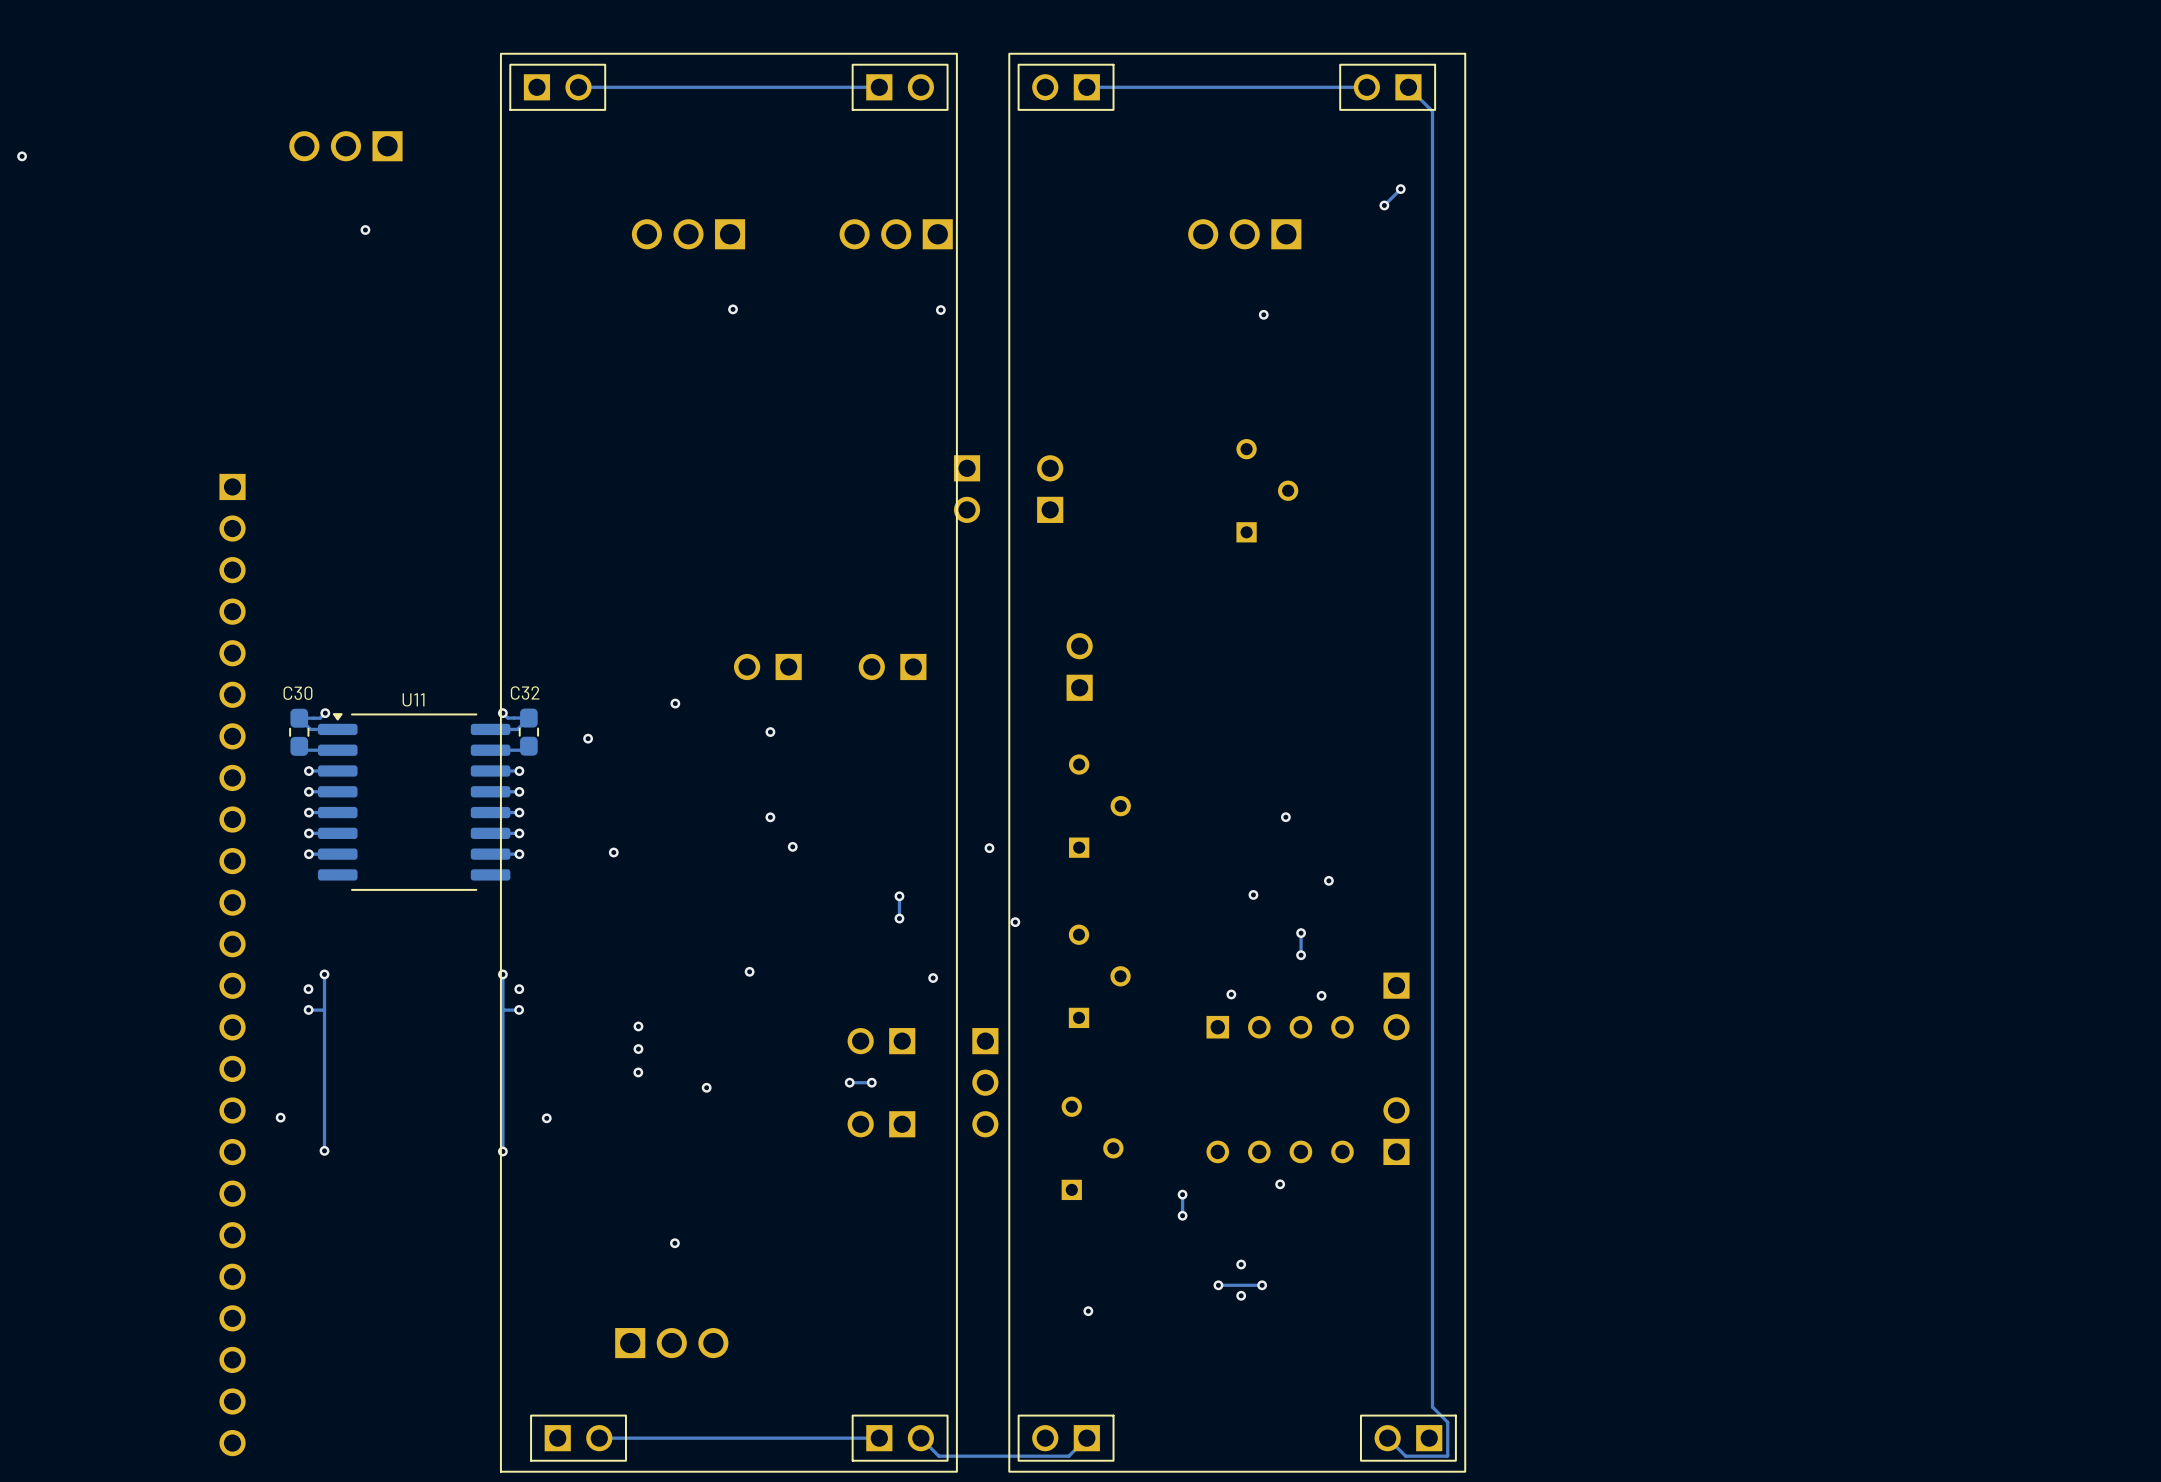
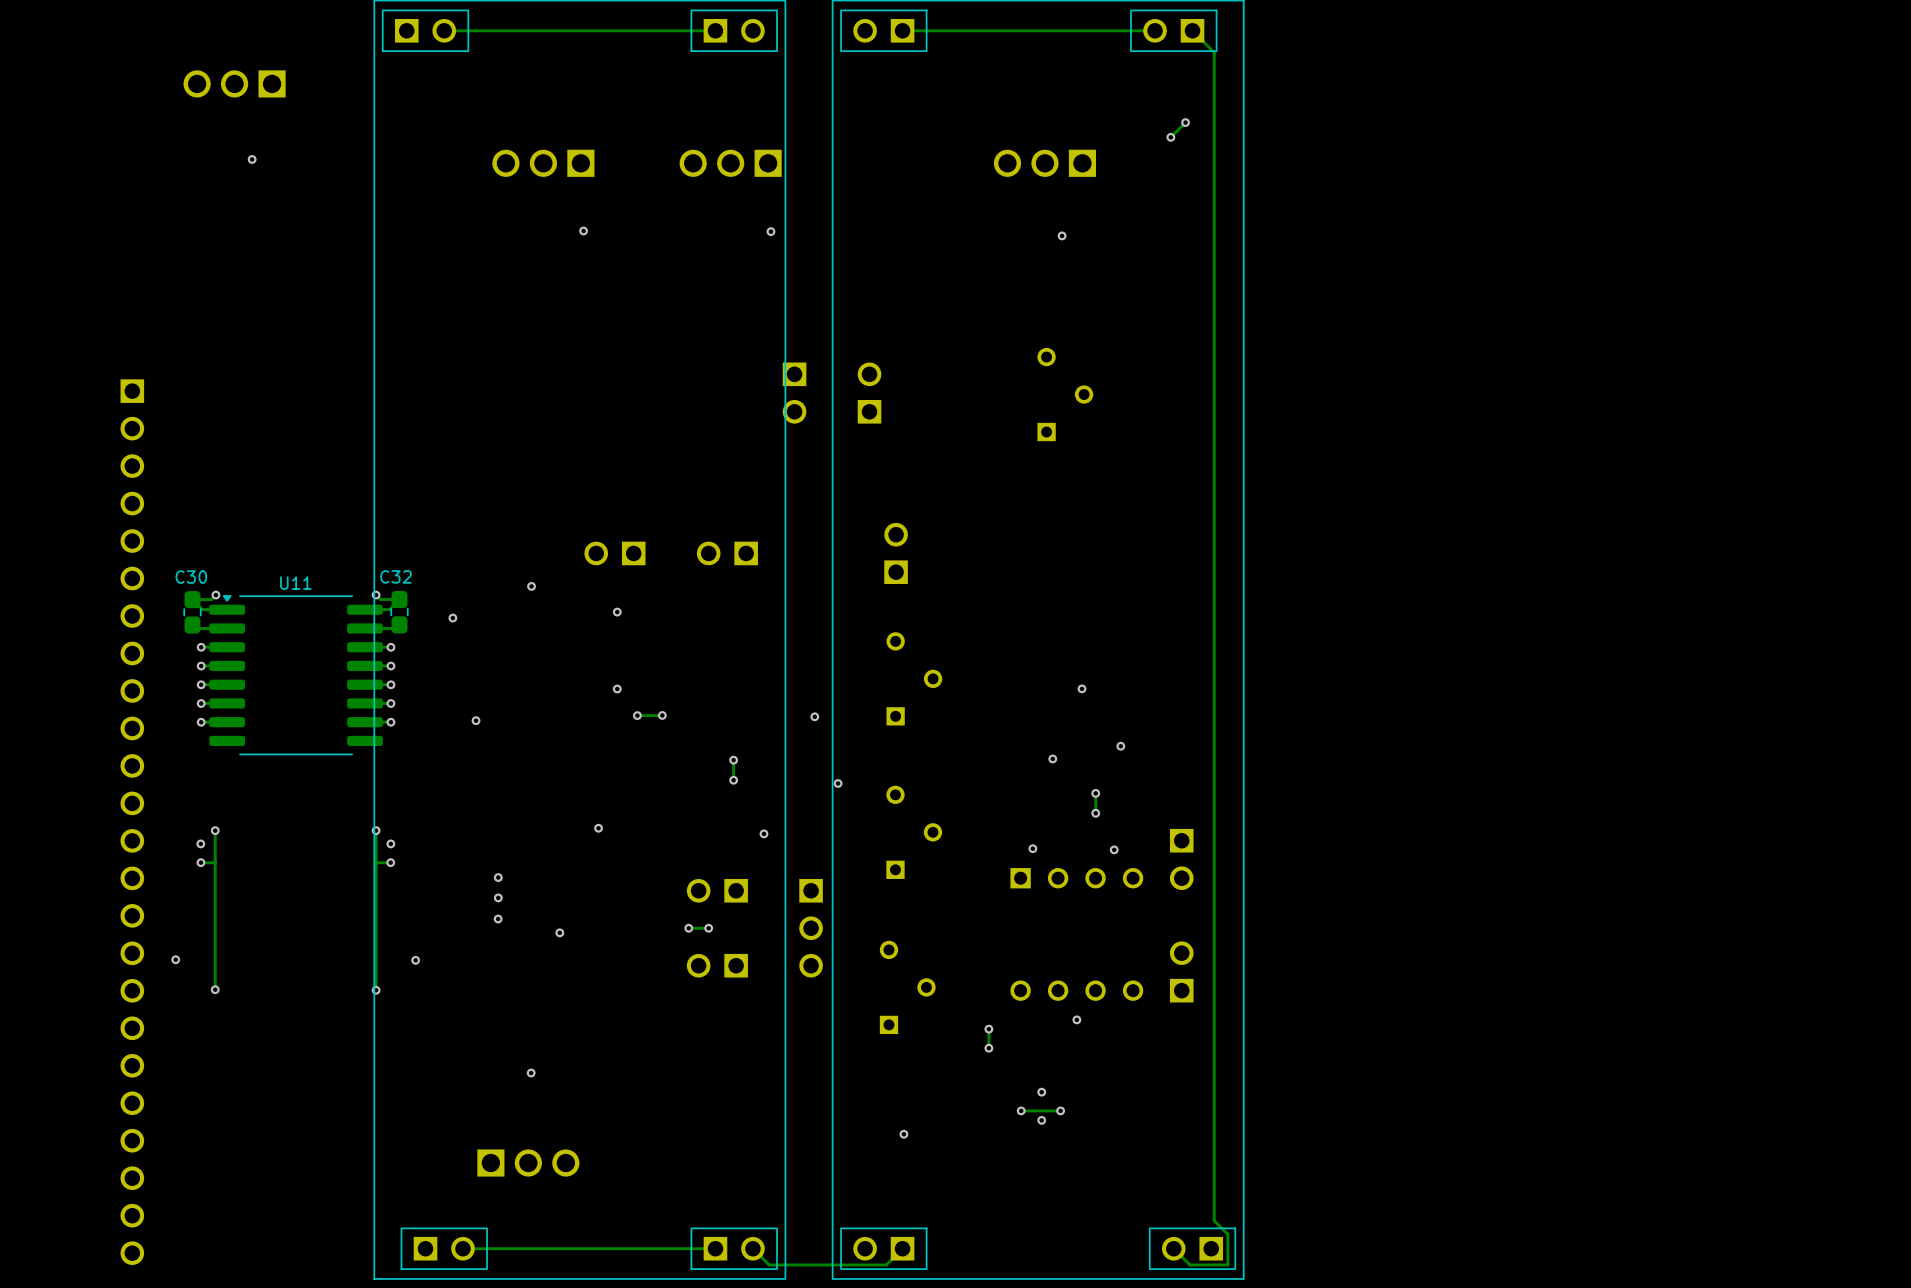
track: none -> (662, 715) (637, 715)
via: none -> (662, 715)

